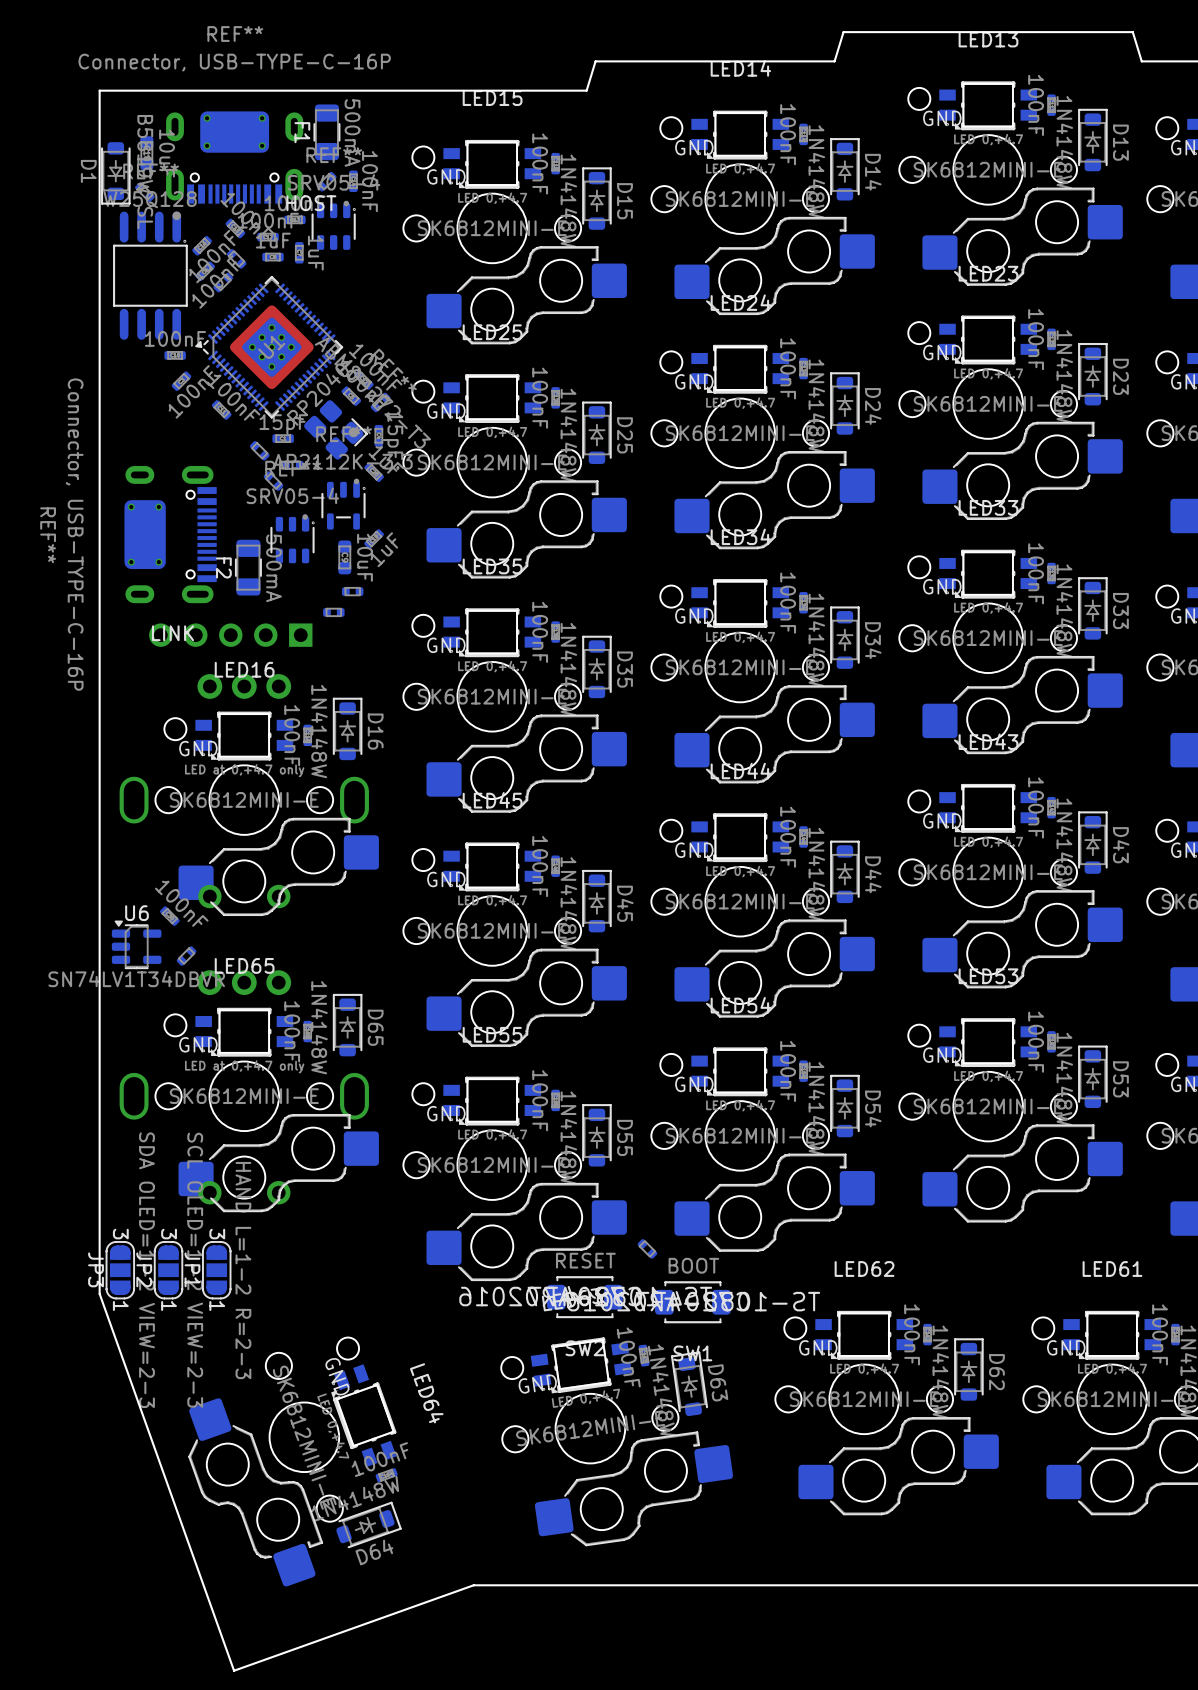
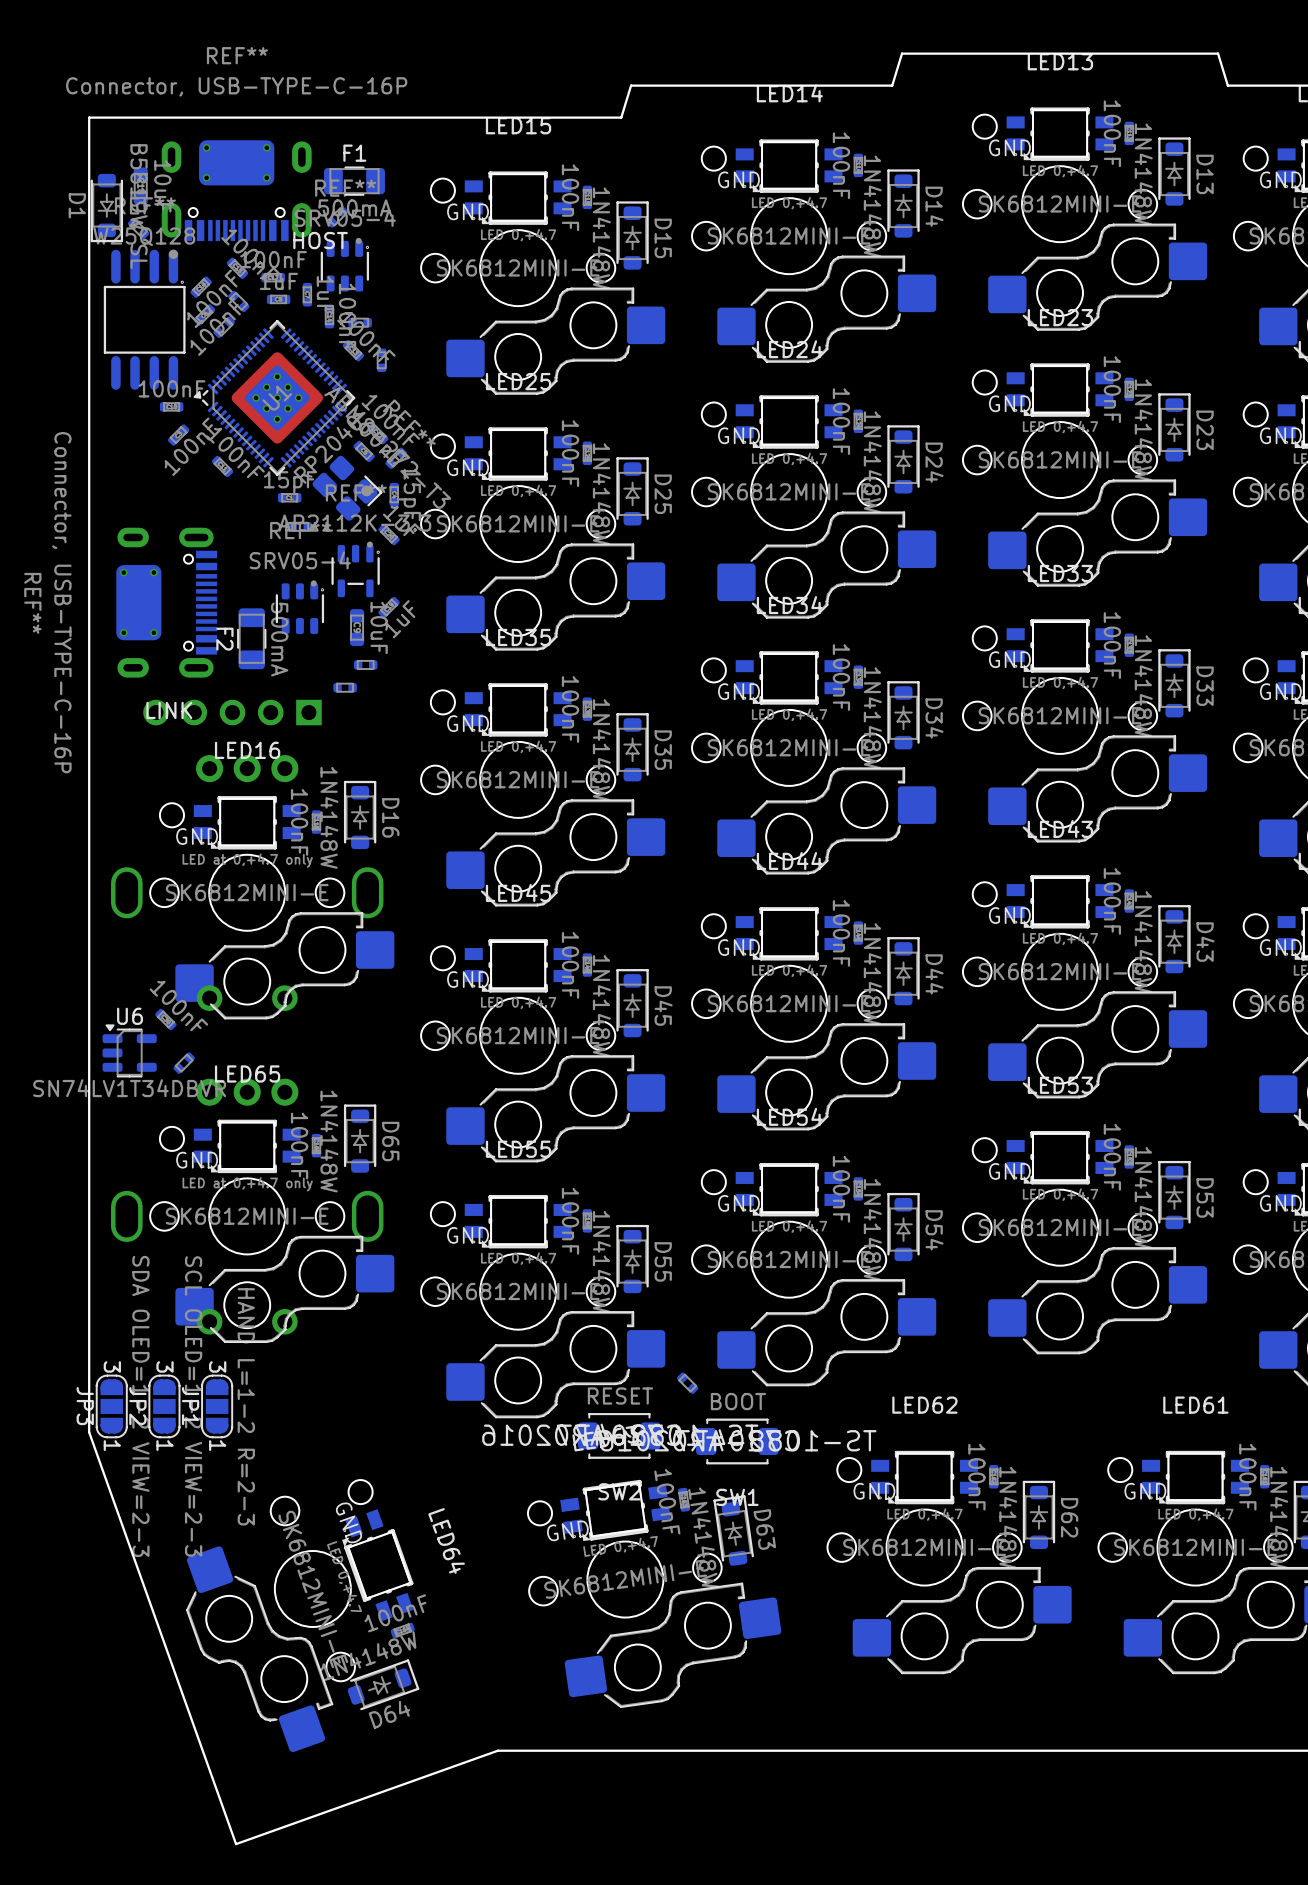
F1 rotation: 0° (326, 132) -> 90° clockwise (354, 181)
part position: (353, 181) -> (329, 316)
part rotation: 0° (294, 219) -> 45° clockwise (353, 350)
part position: (294, 219) -> (353, 350)
part: none -> (360, 322)
part: none -> (381, 360)
part: (259, 450) -> none
part: (273, 481) -> none

